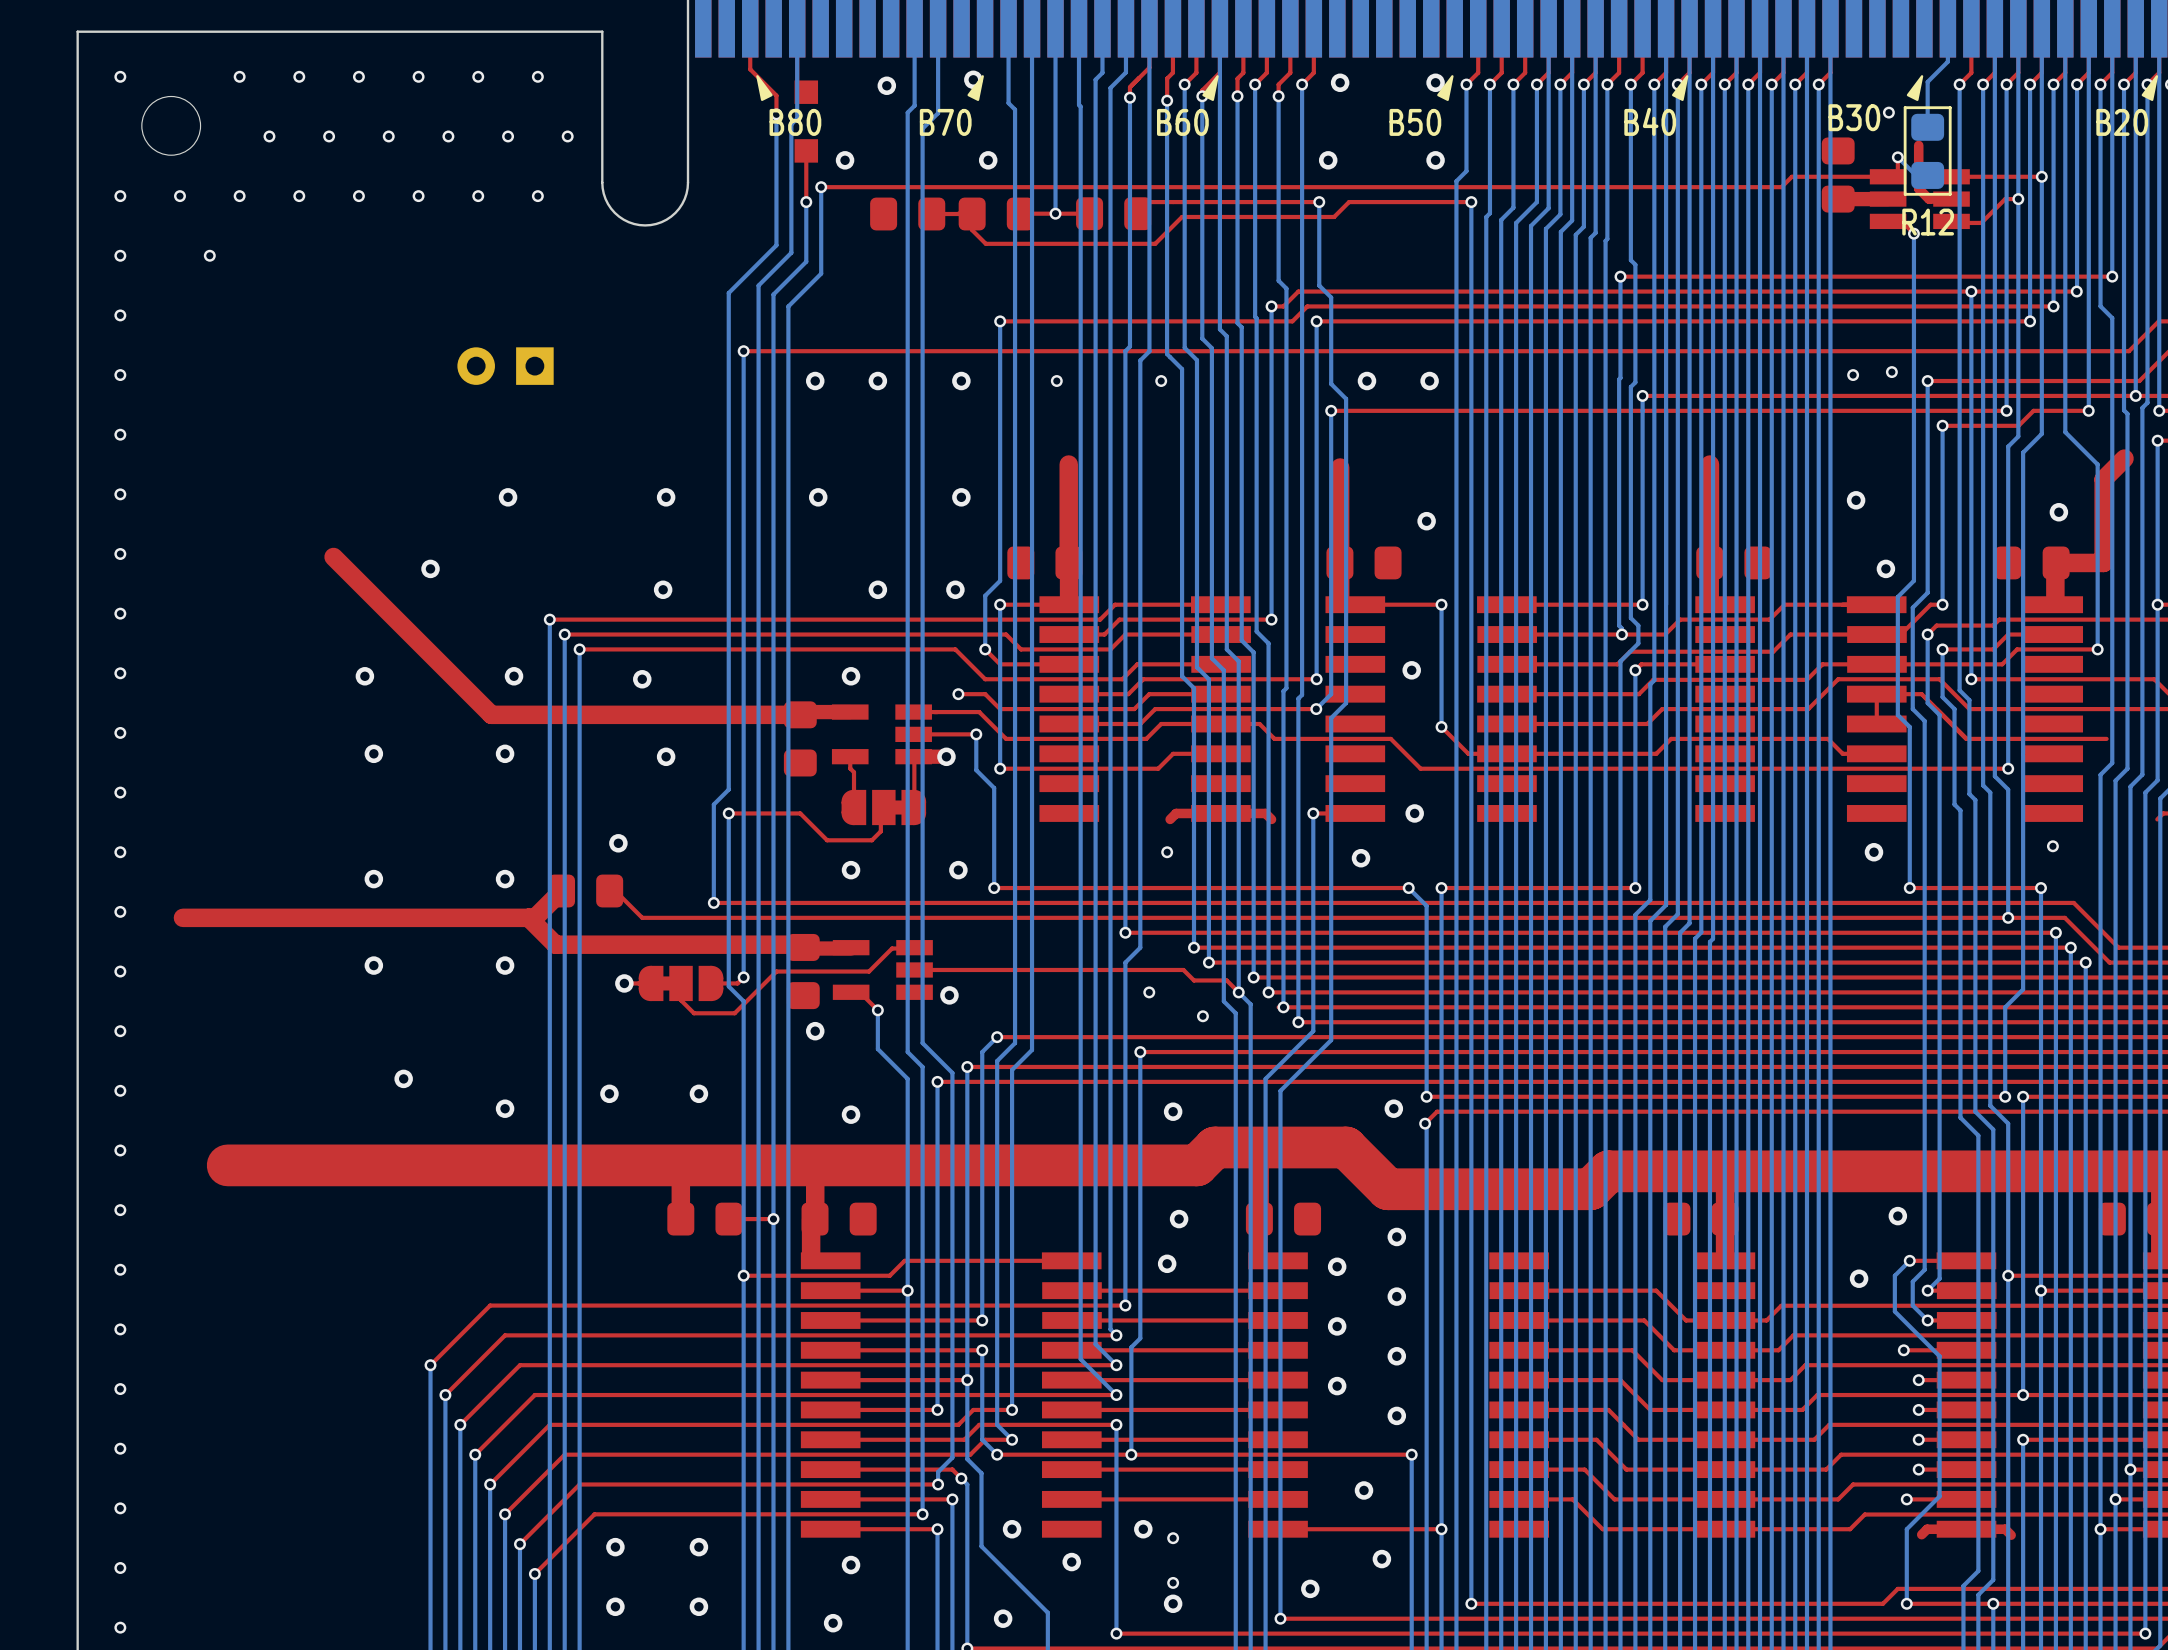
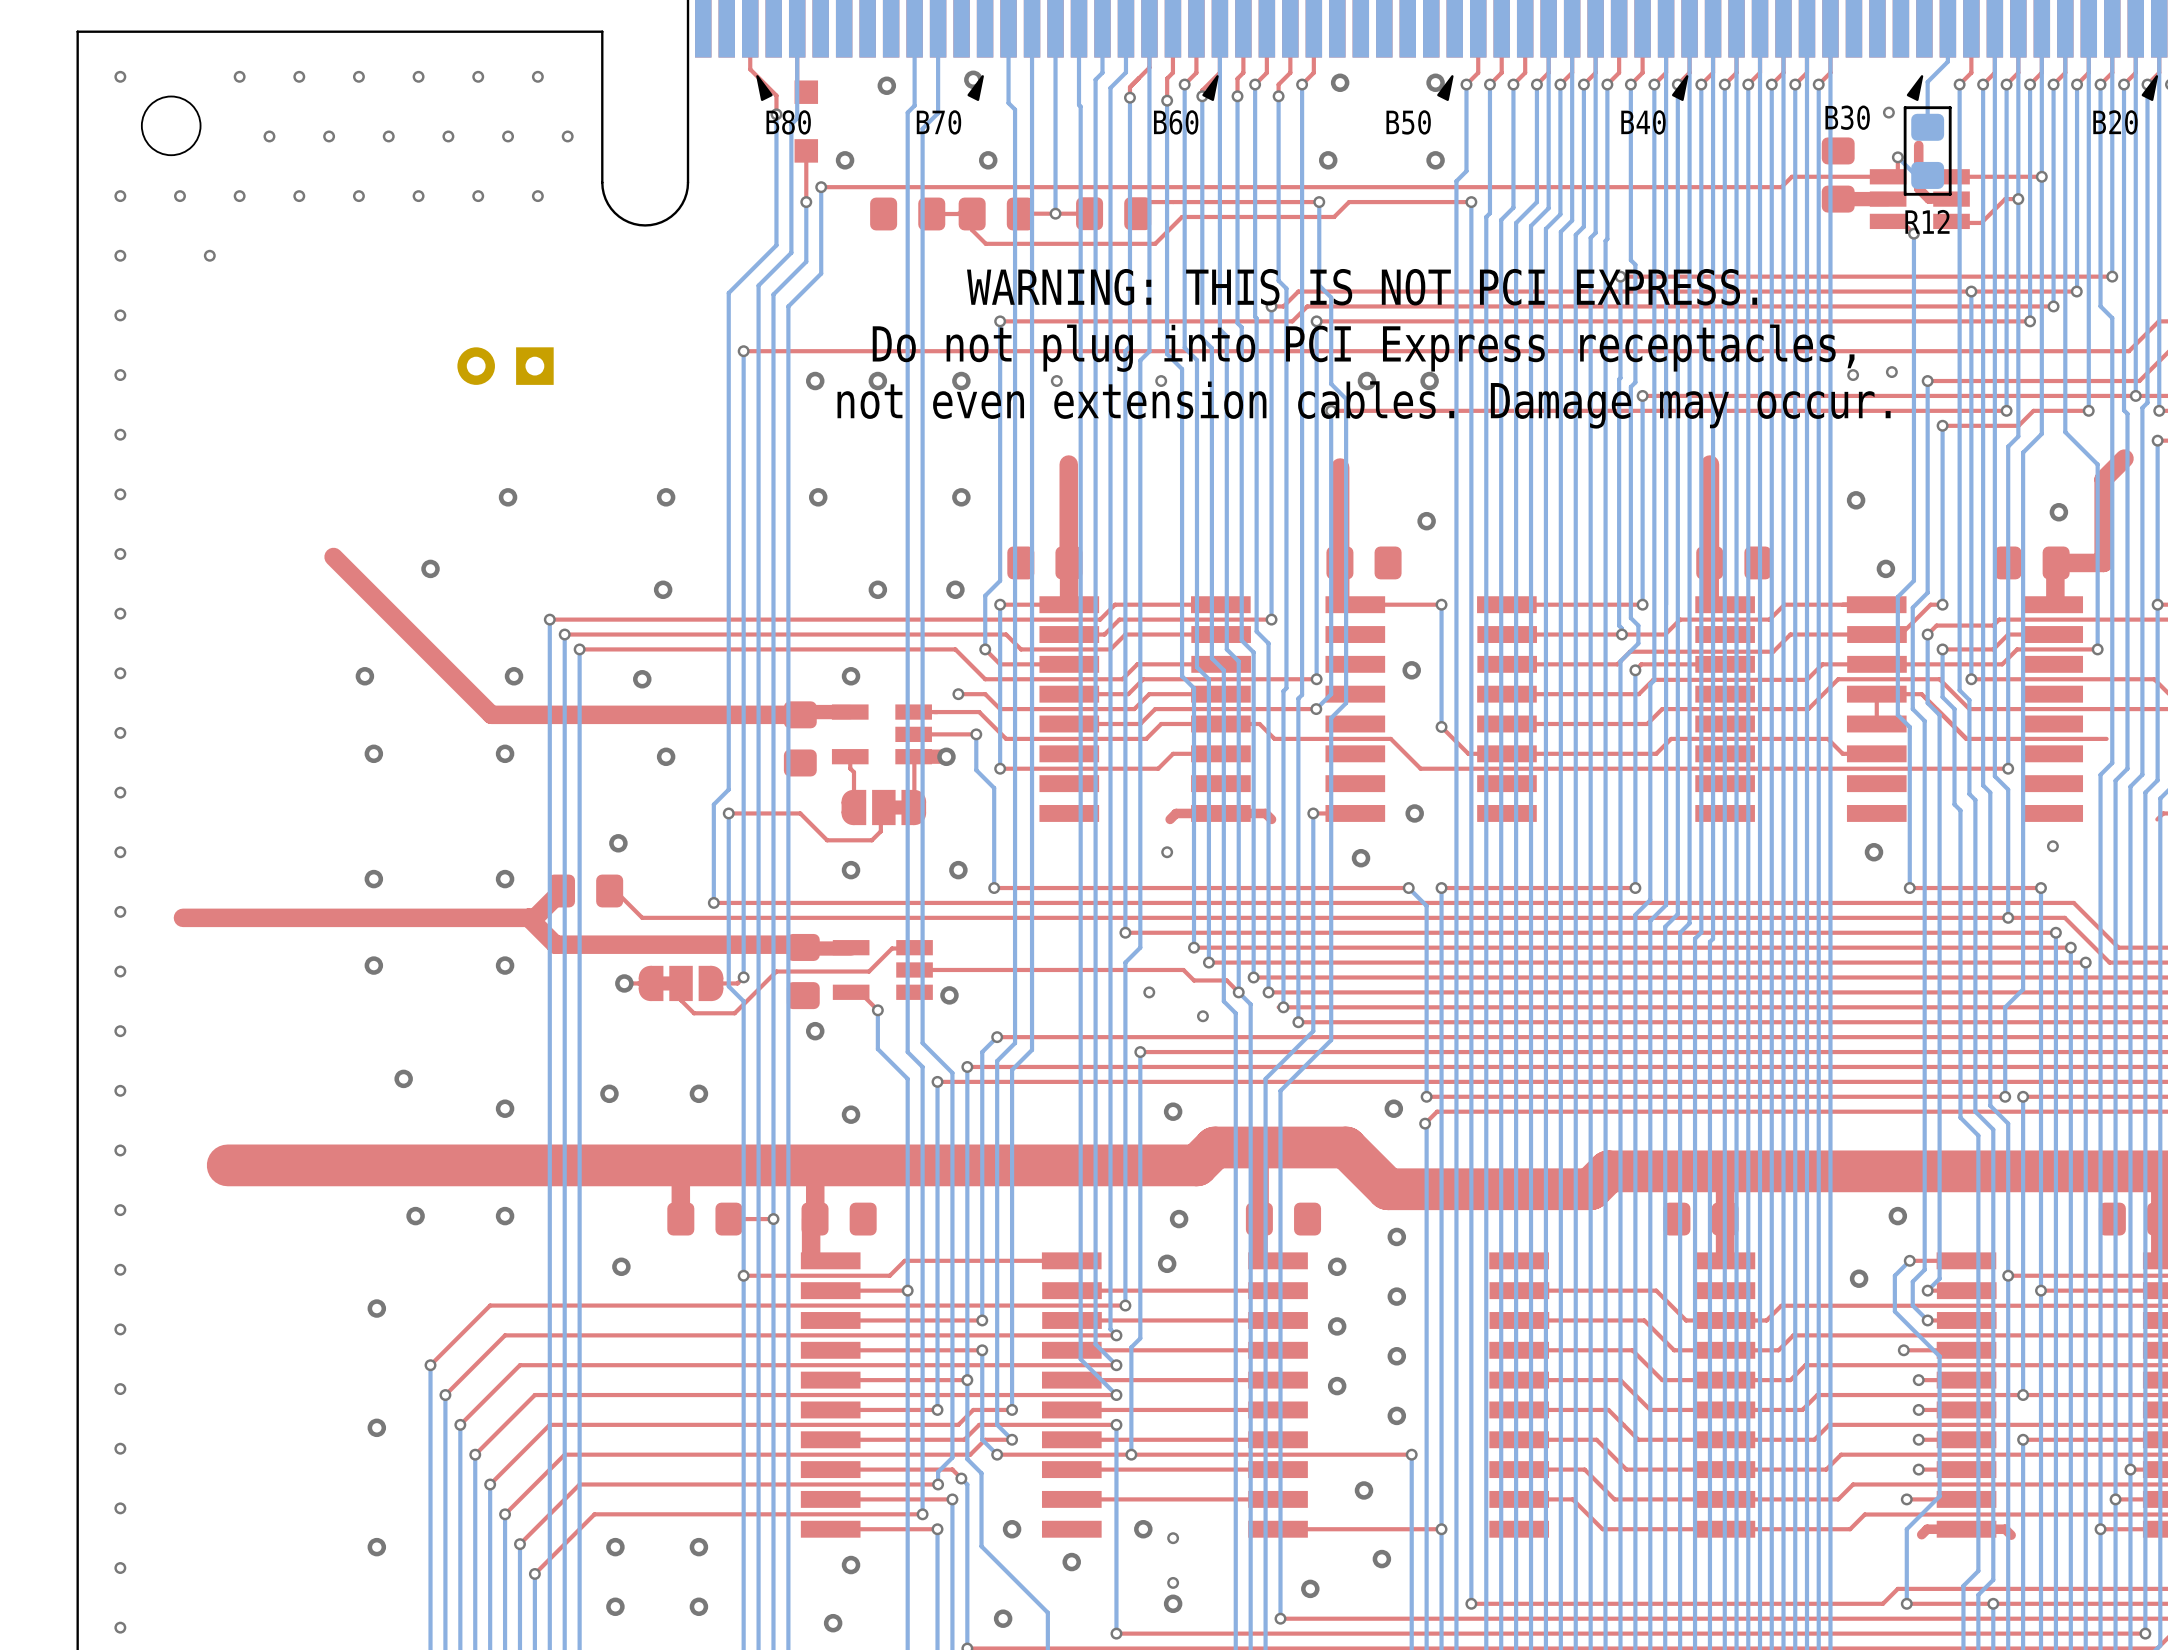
text: none -> WARNING: THIS IS NOT PCI EXPRESS. (1362, 287)
text: none -> Do not plug into PCI Express receptacles, (1363, 348)
text: none -> not even extension cables. Damage may occur. (1364, 404)
via: none -> (415, 1216)
via: none -> (505, 1216)
via: none -> (621, 1266)
via: none -> (376, 1308)
via: none -> (376, 1427)
via: none -> (376, 1547)

